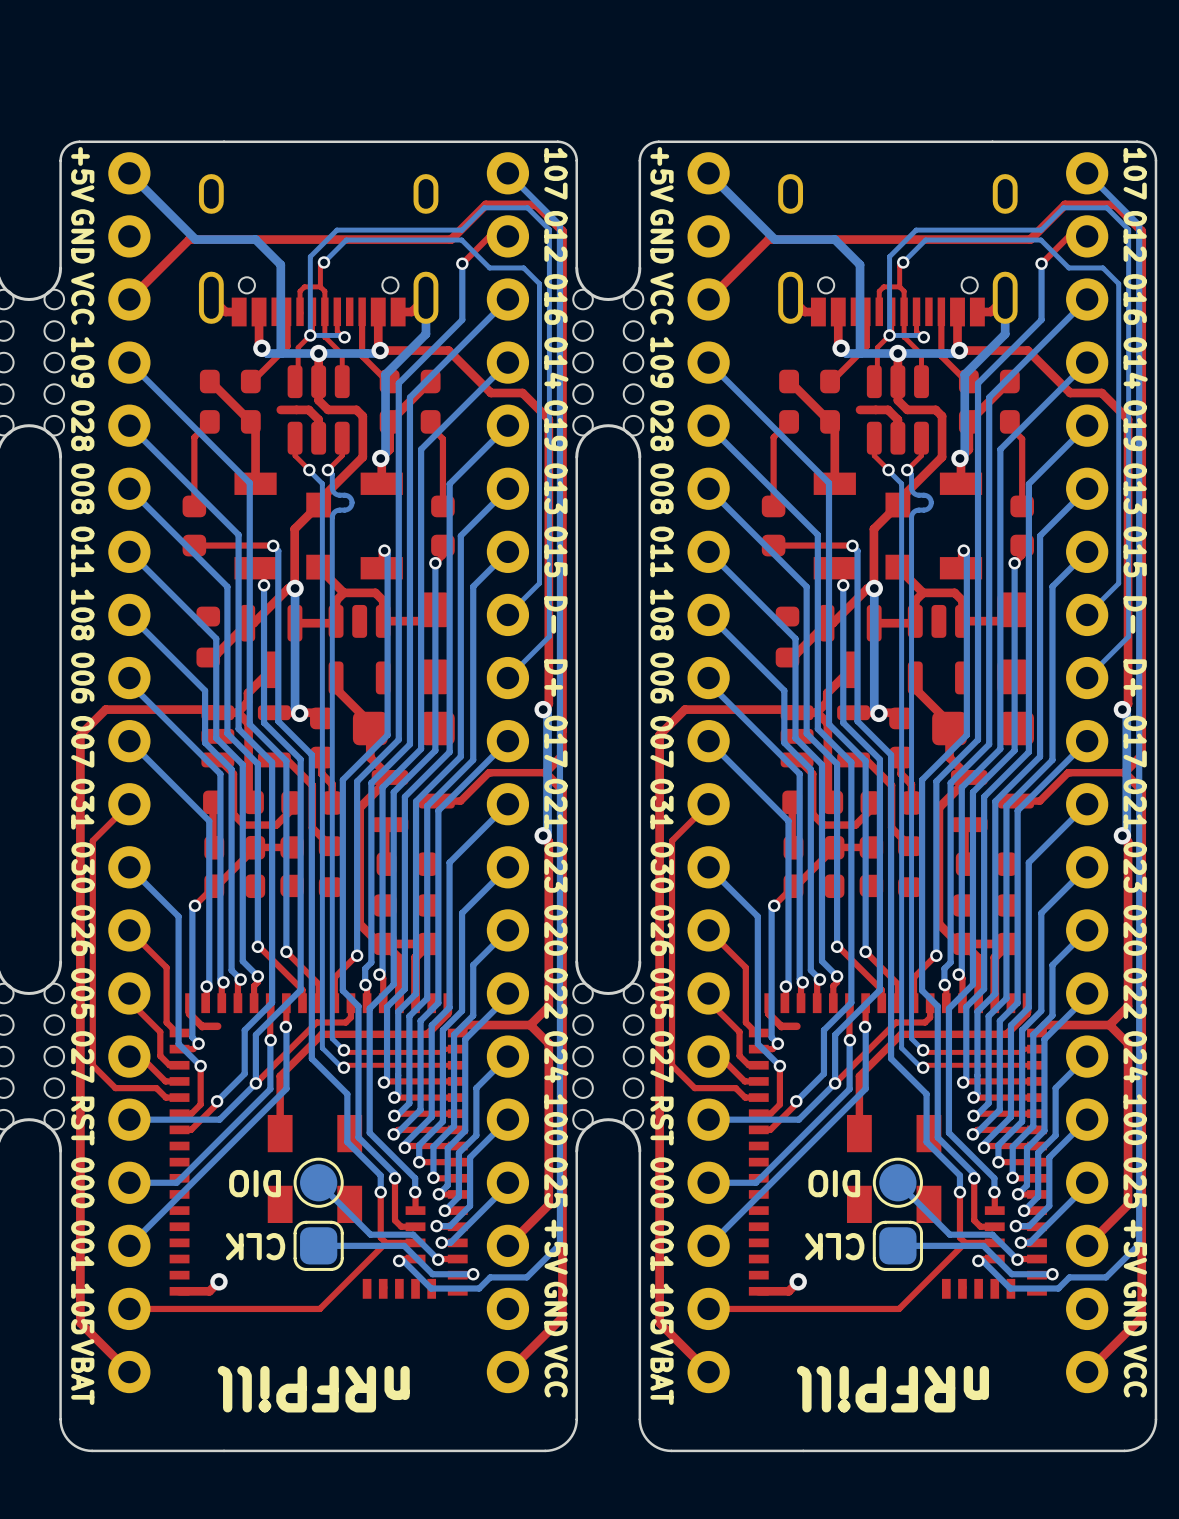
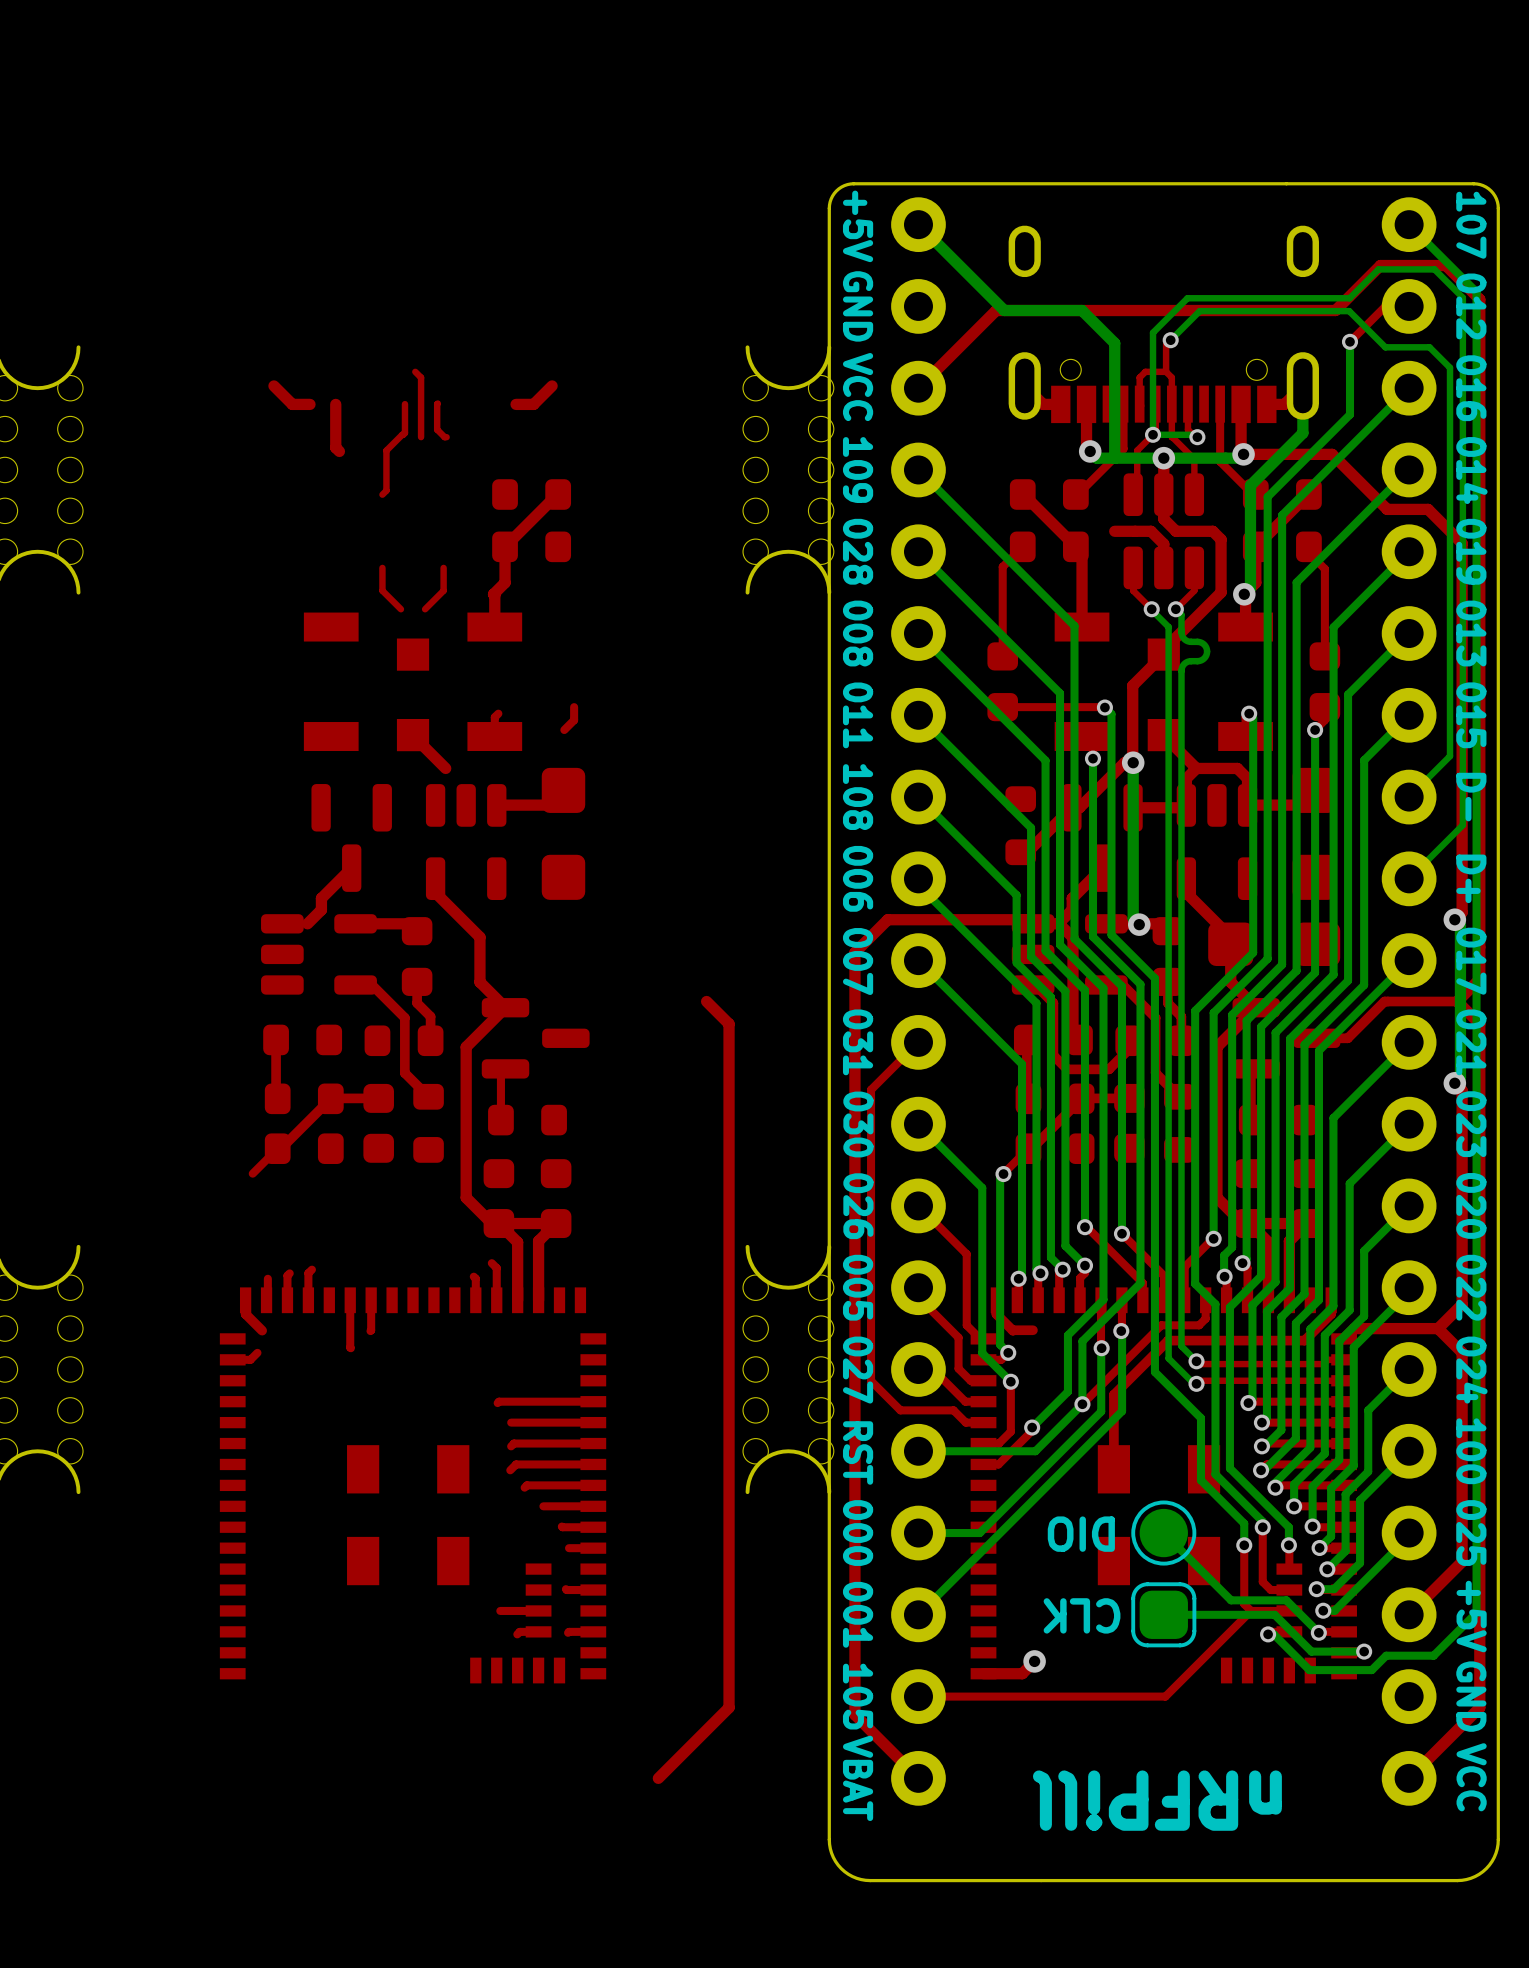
bottom track: (129, 173) (195, 239) (255, 239) (280, 264) (281, 353) -> none
bottom track: (507, 173) (559, 225) (559, 1244) (526, 1277) (490, 1277) (479, 1288) (431, 1288) (403, 1260) (399, 1260) -> none
text: 107 (555, 173) -> none
text: +5V (82, 174) -> none
text: GND (82, 236) -> none
top track: (507, 236) (489, 236) (462, 263) -> none
text: 012 (555, 236) -> none
part: (318, 250) -> none
top track: (323, 262) (320, 266) (320, 286) (304, 286) (300, 291) (301, 313) -> none
bottom track: (323, 262) (346, 240) (461, 240) (489, 267) (523, 267) (539, 283) (539, 583) (507, 614) -> none
via: (323, 262) -> none
bottom track: (462, 263) (462, 319) (398, 383) (398, 739) (357, 781) (357, 955) -> none
via: (462, 263) -> none
board edge: (576, 267) (576, 158) (571, 147) (557, 141) (74, 142) (66, 147) (60, 158) (60, 267) -> none
board edge: none -> (829, 347) (829, 592)
bottom track: (425, 297) (425, 334) (385, 374) (385, 453) (380, 458) -> none
text: VCC (82, 298) -> none
top track: (129, 299) (189, 239) (451, 239) (485, 204) (536, 204) (562, 231) (562, 755) (545, 772) (489, 772) (460, 801) (436, 801) -> none
bottom track: (507, 299) (409, 397) (409, 744) (371, 782) (371, 962) (365, 968) (365, 984) -> none
text: 016 (555, 299) -> none
top track: (287, 311) (287, 346) (252, 381) -> none
top track: (362, 311) (362, 356) (387, 381) -> none
top track: (378, 312) (378, 348) (380, 350) (448, 350) (491, 393) (522, 393) (548, 419) (548, 703) (543, 709) -> none
via: (310, 335) -> none
top track: (325, 337) (342, 354) (342, 381) -> none
bottom track: (344, 337) (342, 335) (310, 335) (310, 256) (336, 230) (462, 230) (484, 207) (527, 207) (549, 229) (549, 636) (507, 678) -> none
via: (344, 337) -> none
bottom track: (261, 348) (267, 353) (377, 353) (380, 350) -> none
via: (261, 348) -> none
via: (380, 350) -> none
top track: (318, 353) (318, 400) (328, 409) (356, 409) (362, 416) (362, 457) (318, 501) (318, 505) (294, 529) (295, 588) (288, 588) (253, 623) (247, 623) (216, 654) (208, 654) -> none
via: (318, 353) -> none
text: 109 (82, 362) -> none
bottom track: (129, 362) (249, 482) (249, 724) (286, 760) (286, 951) -> none
bottom track: (507, 362) (421, 449) (421, 749) (382, 787) (382, 971) (379, 974) -> none
text: 014 (556, 363) -> none
top track: (207, 381) (210, 381) (255, 426) (255, 478) -> none
part: (230, 381) -> none
top track: (280, 409) (308, 409) (318, 419) (318, 438) -> none
part: (318, 409) -> none
top track: (209, 421) (194, 437) (194, 506) -> none
part: (230, 421) -> none
text: 028 (82, 425) -> none
bottom track: (129, 425) (238, 534) (238, 728) (272, 762) (272, 1002) (244, 1030) (244, 1073) (217, 1101) -> none
bottom track: (507, 425) (449, 483) (449, 752) (404, 796) (404, 989) (387, 1006) (387, 1079) (383, 1082) -> none
text: 019 (555, 425) -> none
top track: (432, 428) (442, 438) (442, 506) -> none
board edge: (60, 457) (60, 961) -> none
board edge: (576, 457) (576, 961) -> none
via: (380, 458) -> none
bottom track: (309, 470) (322, 483) (322, 1048) (343, 1067) -> none
via: (309, 470) -> none
bottom track: (327, 470) (332, 474) (333, 492) (337, 494) (348, 496) (352, 502) (349, 508) (336, 511) (332, 517) (332, 1038) (343, 1050) -> none
via: (327, 470) -> none
text: 008 (82, 488) -> none
bottom track: (129, 488) (227, 586) (227, 733) (257, 764) (257, 946) -> none
bottom track: (507, 488) (460, 535) (460, 756) (416, 801) (416, 993) (398, 1011) (398, 1093) (394, 1097) -> none
text: 013 (555, 488) -> none
part: (194, 525) -> none
part: (442, 525) -> none
top track: (272, 545) (194, 545) -> none
bottom track: (273, 545) (278, 550) (278, 721) (311, 754) (311, 1058) (347, 1094) (347, 1142) (380, 1175) (380, 1192) -> none
via: (273, 545) -> none
bottom track: (384, 550) (387, 553) (387, 735) (342, 779) (342, 990) (358, 1006) (358, 1137) (394, 1173) (394, 1178) -> none
via: (384, 550) -> none
text: 011 (82, 551) -> none
bottom track: (129, 551) (216, 638) (216, 738) (242, 764) (242, 961) (257, 976) -> none
bottom track: (507, 551) (473, 586) (473, 760) (427, 806) (427, 998) (409, 1016) (409, 1103) (396, 1115) (394, 1115) -> none
text: 015 (555, 551) -> none
bottom track: (435, 563) (435, 750) (393, 792) (393, 984) (369, 1008) (369, 1132) (415, 1178) (415, 1192) -> none
via: (435, 563) -> none
bottom track: (264, 585) (264, 722) (300, 759) (300, 990) (255, 1034) (255, 1083) (219, 1119) (129, 1119) -> none
via: (264, 585) -> none
bottom track: (295, 588) (295, 708) (299, 713) -> none
via: (295, 588) -> none
text: 108 (82, 614) -> none
bottom track: (129, 614) (205, 690) (205, 742) (231, 769) (231, 970) (237, 976) -> none
text: D- (555, 614) -> none
top track: (383, 621) (383, 600) (375, 592) (343, 592) (336, 600) (336, 621) (334, 623) (294, 623) -> none
part: (208, 637) -> none
text: 006 (82, 678) -> none
bottom track: (129, 678) (129, 682) (220, 773) (220, 979) (223, 982) -> none
text: D+ (555, 678) -> none
bottom track: (543, 709) (547, 713) (547, 831) (543, 835) -> none
via: (543, 709) -> none
via: (299, 713) -> none
part: (403, 728) -> none
text: 007 (82, 741) -> none
bottom track: (129, 741) (209, 821) (209, 984) (206, 986) -> none
bottom track: (507, 741) (438, 810) (438, 1003) (420, 1020) (420, 1109) (396, 1134) (393, 1134) -> none
text: 017 (555, 741) -> none
top track: (217, 759) (233, 773) (233, 814) (244, 825) (276, 825) (291, 810) (291, 802) -> none
part: (129, 772) -> none
part: (507, 772) -> none
top track: (253, 802) (248, 796) (248, 723) (237, 712) (214, 712) (211, 709) (105, 709) (80, 734) (80, 1323) (129, 1372) -> none
text: 031 (82, 804) -> none
top track: (129, 804) (92, 840) (92, 1065) (115, 1088) (156, 1088) (165, 1097) (179, 1097) -> none
bottom track: (507, 804) (449, 862) (449, 1007) (431, 1025) (431, 1116) (404, 1143) (404, 1147) -> none
text: 021 (555, 804) -> none
top track: (543, 835) (548, 841) (548, 1006) (530, 1025) -> none
via: (543, 835) -> none
text: 030 (83, 867) -> none
bottom track: (129, 867) (178, 916) (178, 1043) (200, 1066) -> none
bottom track: (507, 867) (462, 913) (462, 1010) (442, 1030) (442, 1121) (419, 1145) (419, 1162) -> none
text: 023 (555, 867) -> none
bottom track: (194, 905) (192, 908) (192, 1037) (198, 1043) -> none
via: (194, 905) -> none
text: 026 (83, 930) -> none
top track: (129, 930) (166, 967) (166, 1022) (177, 1032) (179, 1032) -> none
bottom track: (507, 930) (473, 965) (473, 1015) (454, 1034) (454, 1126) (433, 1146) (433, 1177) -> none
text: 020 (555, 930) -> none
top track: (257, 946) (302, 989) (302, 1003) -> none
via: (257, 946) -> none
top track: (286, 951) (318, 984) (318, 1003) -> none
via: (286, 951) -> none
top track: (357, 955) (334, 977) (334, 1003) -> none
via: (357, 955) -> none
board edge: none -> (829, 1246) (829, 1492)
via: (379, 974) -> none
top track: (257, 976) (257, 982) (254, 986) (254, 1003) -> none
via: (257, 976) -> none
via: (240, 979) -> none
via: (223, 982) -> none
via: (365, 984) -> none
via: (206, 986) -> none
text: 005 (82, 993) -> none
top track: (129, 993) (129, 1001) (160, 1032) (160, 1055) (169, 1065) (179, 1065) -> none
bottom track: (507, 993) (507, 996) (465, 1039) (465, 1130) (447, 1148) (447, 1185) (438, 1194) -> none
text: 022 (555, 993) -> none
top track: (350, 1003) (350, 1017) (345, 1022) (316, 1022) (255, 1083) -> none
top track: (447, 1003) (447, 1013) (427, 1034) (322, 1034) (280, 1076) (280, 1133) -> none
top track: (530, 1025) (465, 1025) (457, 1032) -> none
top track: (530, 1025) (548, 1043) (548, 1204) (507, 1245) -> none
top track: (217, 1026) (202, 1026) -> none
bottom track: (285, 1026) (286, 1088) (129, 1245) -> none
via: (285, 1026) -> none
bottom track: (270, 1040) (270, 1089) (176, 1182) (129, 1182) -> none
via: (270, 1040) -> none
via: (198, 1043) -> none
top track: (457, 1049) (445, 1049) (442, 1052) (346, 1052) (343, 1050) -> none
via: (343, 1050) -> none
top track: (129, 1056) (140, 1056) (165, 1081) (179, 1081) -> none
bottom track: (507, 1056) (476, 1088) (476, 1135) (458, 1152) (458, 1196) (444, 1210) -> none
text: 027 (82, 1057) -> none
text: 024 (556, 1057) -> none
top track: (457, 1065) (346, 1065) (343, 1067) -> none
top track: (200, 1066) (200, 1104) (191, 1113) (179, 1113) -> none
via: (200, 1066) -> none
via: (343, 1067) -> none
via: (383, 1082) -> none
via: (255, 1083) -> none
via: (394, 1097) -> none
top track: (217, 1101) (217, 1103) (191, 1129) (179, 1129) -> none
via: (217, 1101) -> none
via: (394, 1115) -> none
bottom track: (507, 1119) (470, 1157) (470, 1205) (449, 1226) (436, 1227) -> none
text: 100 (555, 1119) -> none
text: RST (82, 1121) -> none
via: (393, 1134) -> none
via: (404, 1147) -> none
board edge: (576, 1151) (576, 1422) (571, 1436) (564, 1444) (555, 1449) (545, 1450) (92, 1450) (75, 1446) (63, 1433) (60, 1419) (60, 1151) -> none
via: (419, 1162) -> none
via: (433, 1177) -> none
top track: (394, 1178) (394, 1220) (401, 1226) (415, 1226) -> none
via: (394, 1178) -> none
text: 000 (82, 1182) -> none
bottom track: (318, 1182) (370, 1234) (413, 1234) (438, 1259) -> none
part: (318, 1182) -> none
bottom track: (507, 1182) (507, 1185) (450, 1242) (441, 1242) -> none
text: 025 (555, 1182) -> none
text: DIO (255, 1183) -> none
top track: (380, 1192) (380, 1237) (385, 1242) (319, 1308) (129, 1308) -> none
via: (380, 1192) -> none
top track: (415, 1192) (415, 1210) -> none
via: (415, 1192) -> none
via: (438, 1194) -> none
via: (444, 1210) -> none
via: (436, 1226) -> none
via: (441, 1242) -> none
text: 001 (82, 1245) -> none
bottom track: (318, 1245) (404, 1245) (432, 1274) (473, 1274) -> none
part: (318, 1245) -> none
text: CLK (255, 1246) -> none
text: +5V (556, 1247) -> none
via: (438, 1259) -> none
via: (399, 1260) -> none
via: (473, 1274) -> none
top track: (218, 1281) (209, 1291) (179, 1291) -> none
via: (218, 1281) -> none
text: 105 (82, 1308) -> none
text: GND (555, 1308) -> none
text: VCC (556, 1371) -> none
text: VBAT (82, 1372) -> none
text: nRFPill (313, 1389) -> none

